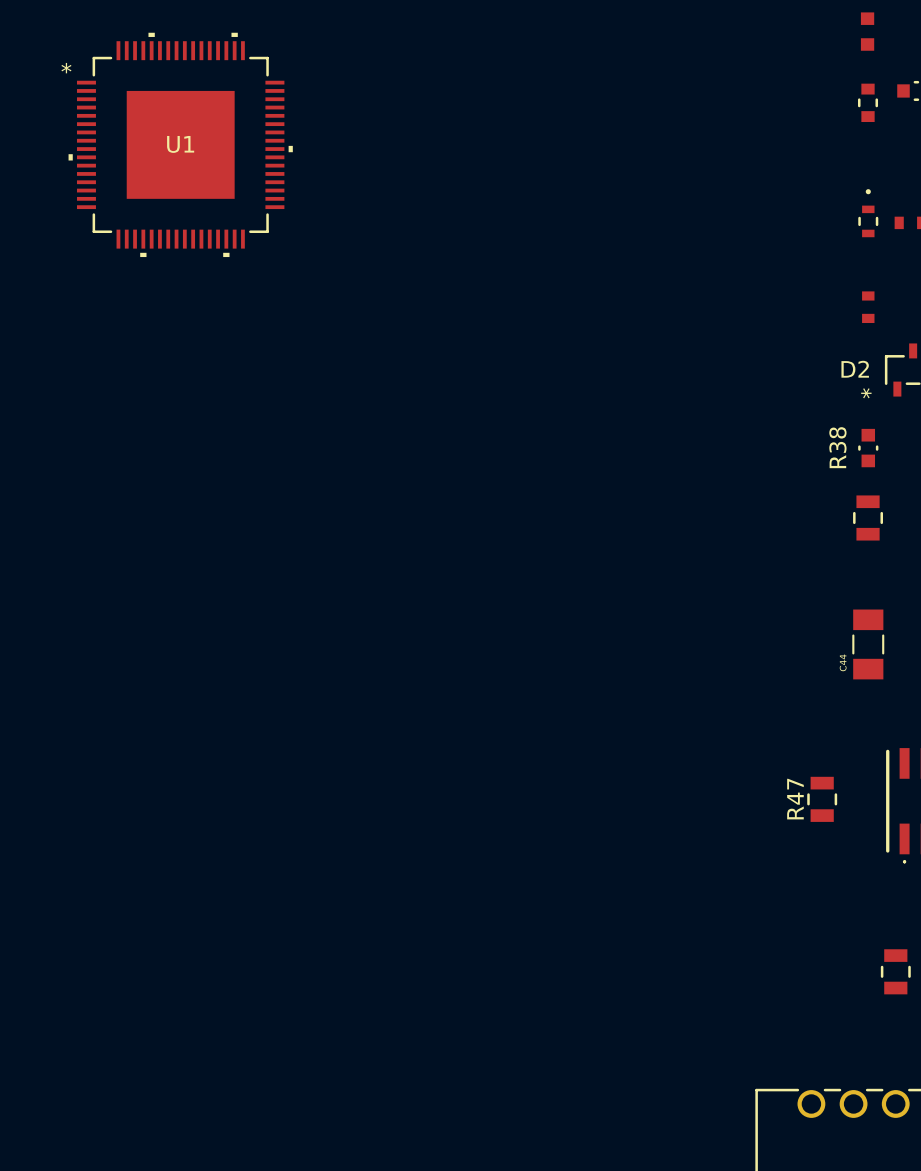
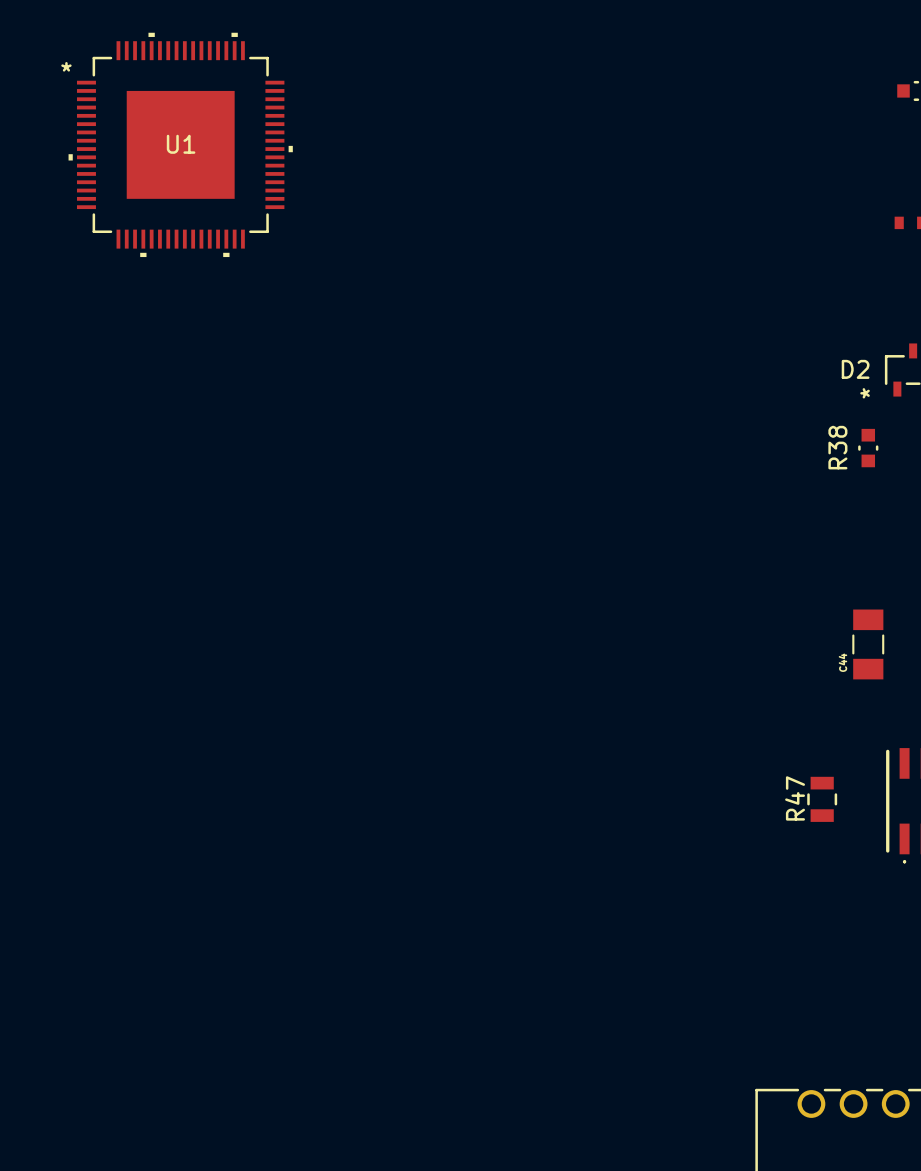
part: (867, 31) -> none
part: (868, 102) -> none
part: (868, 213) -> none
part: (868, 307) -> none
part: (868, 517) -> none
part: (895, 971) -> none

